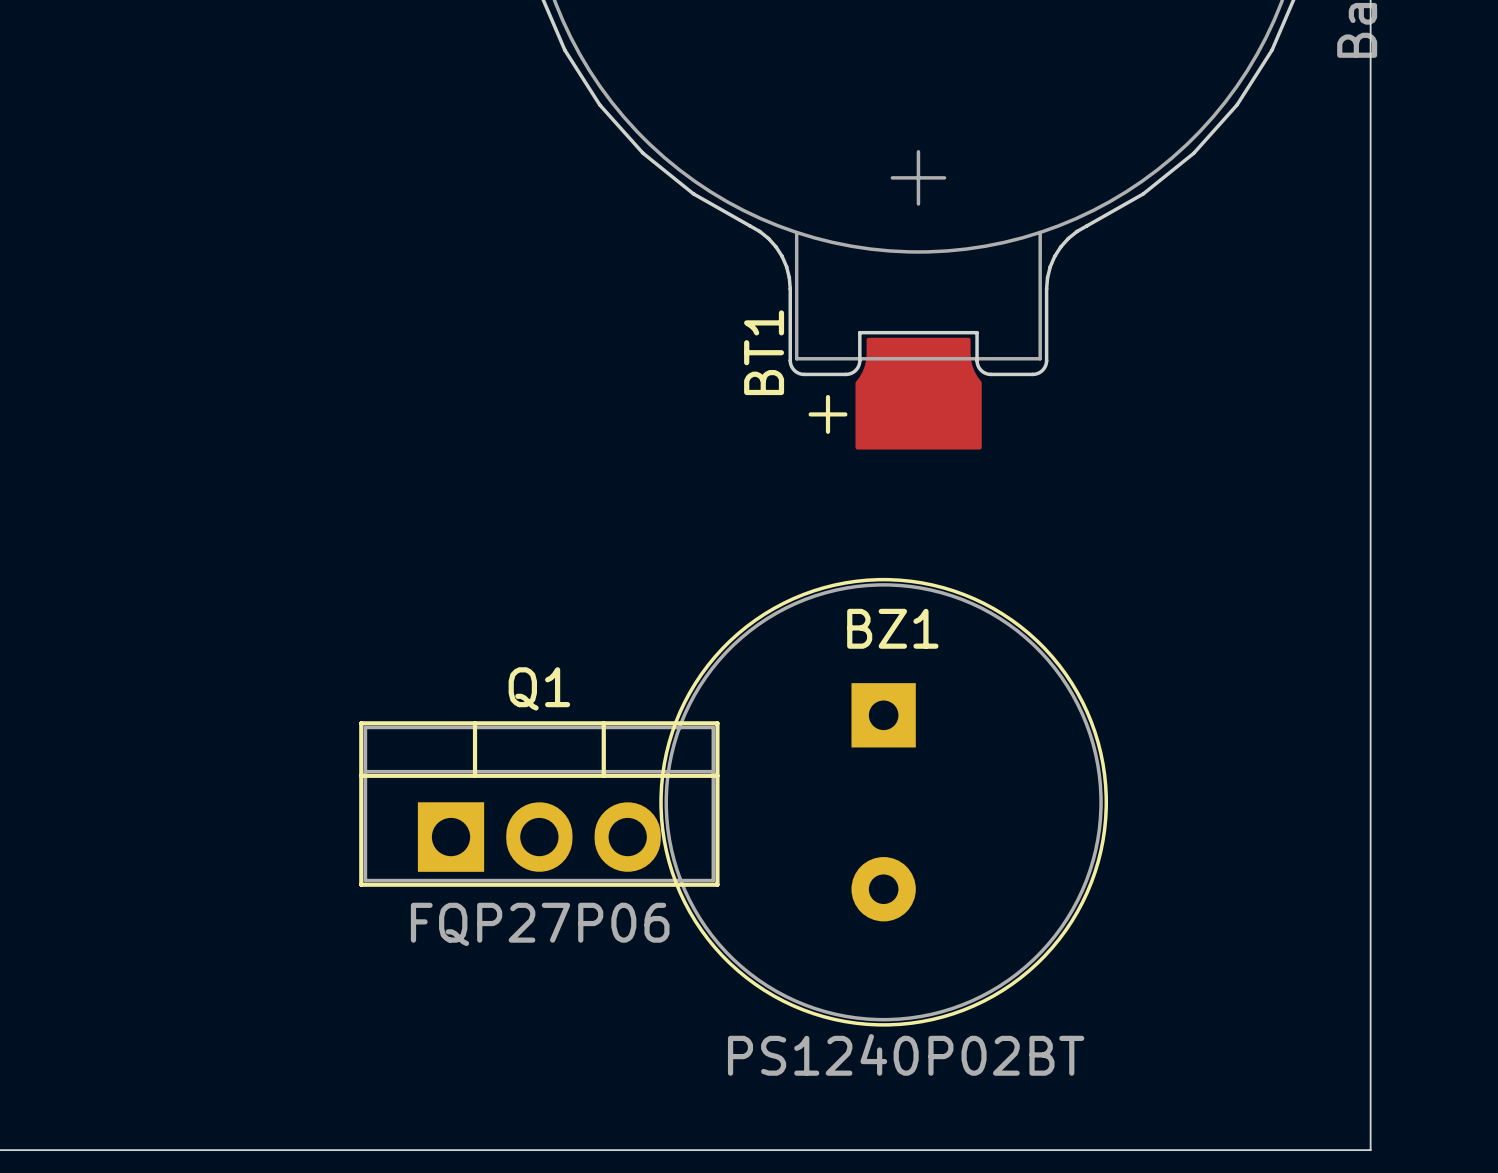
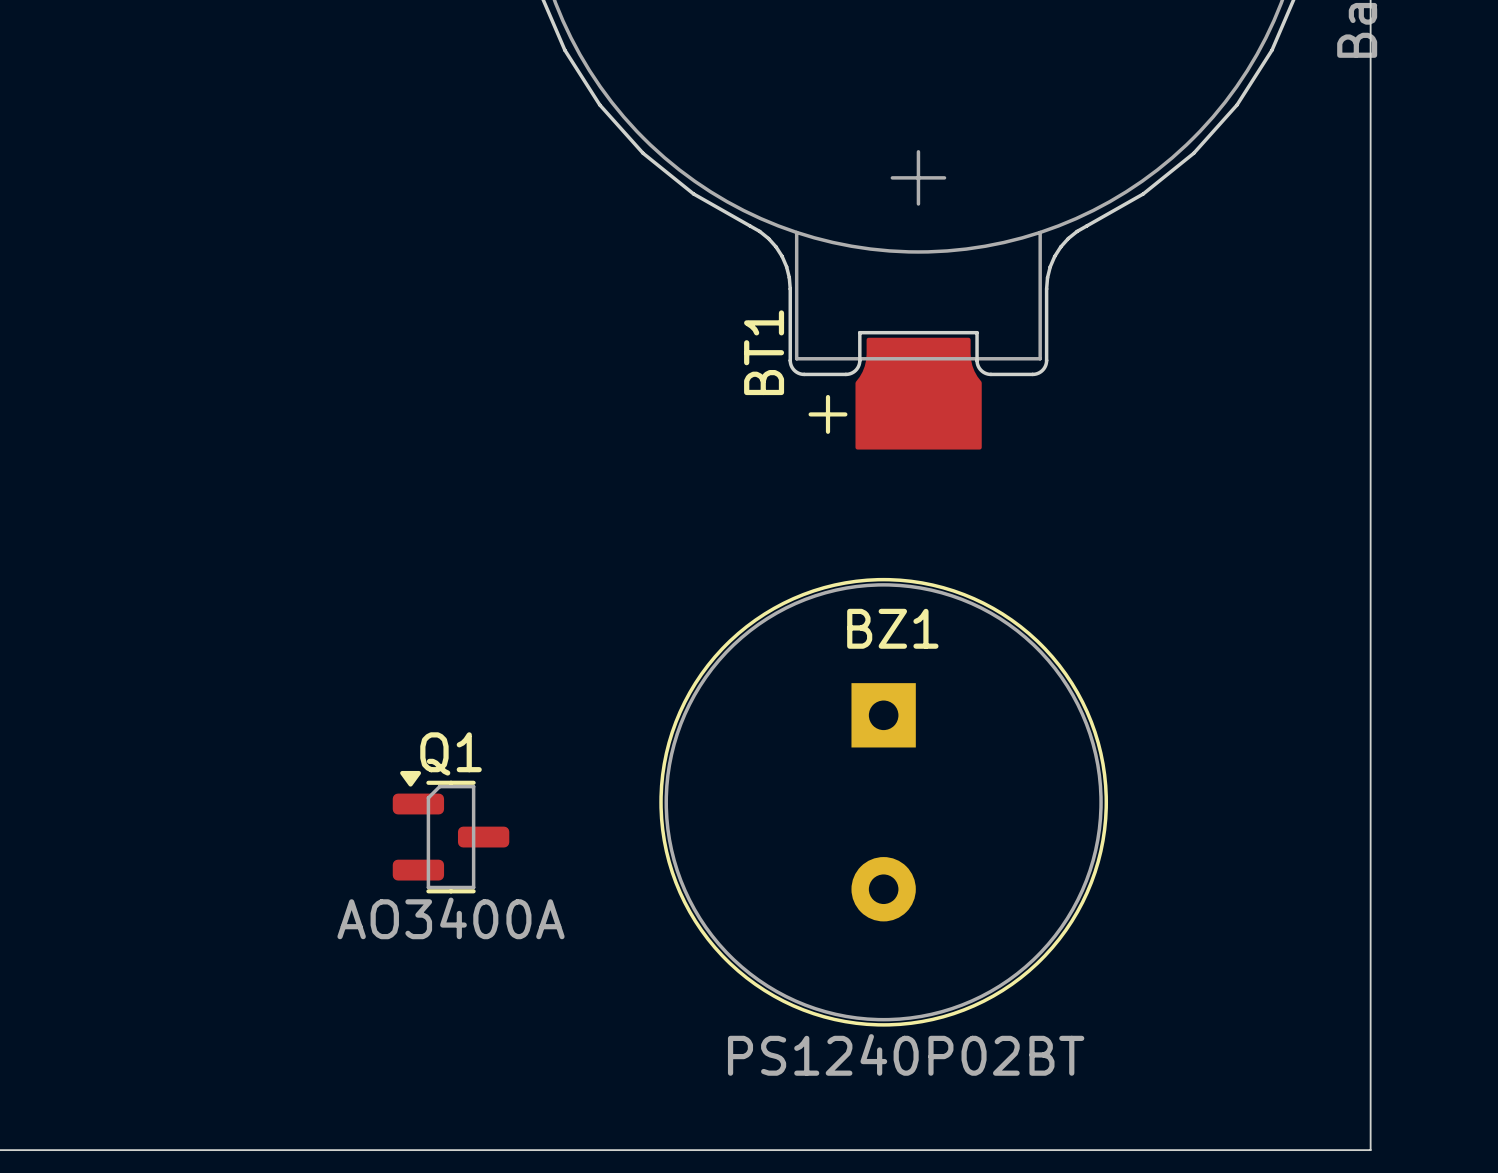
Q1 footprint: [359, 721, 720, 887] -> [392, 770, 510, 894]
Q1 value: FQP27P06 (540, 924) -> AO3400A (451, 918)

